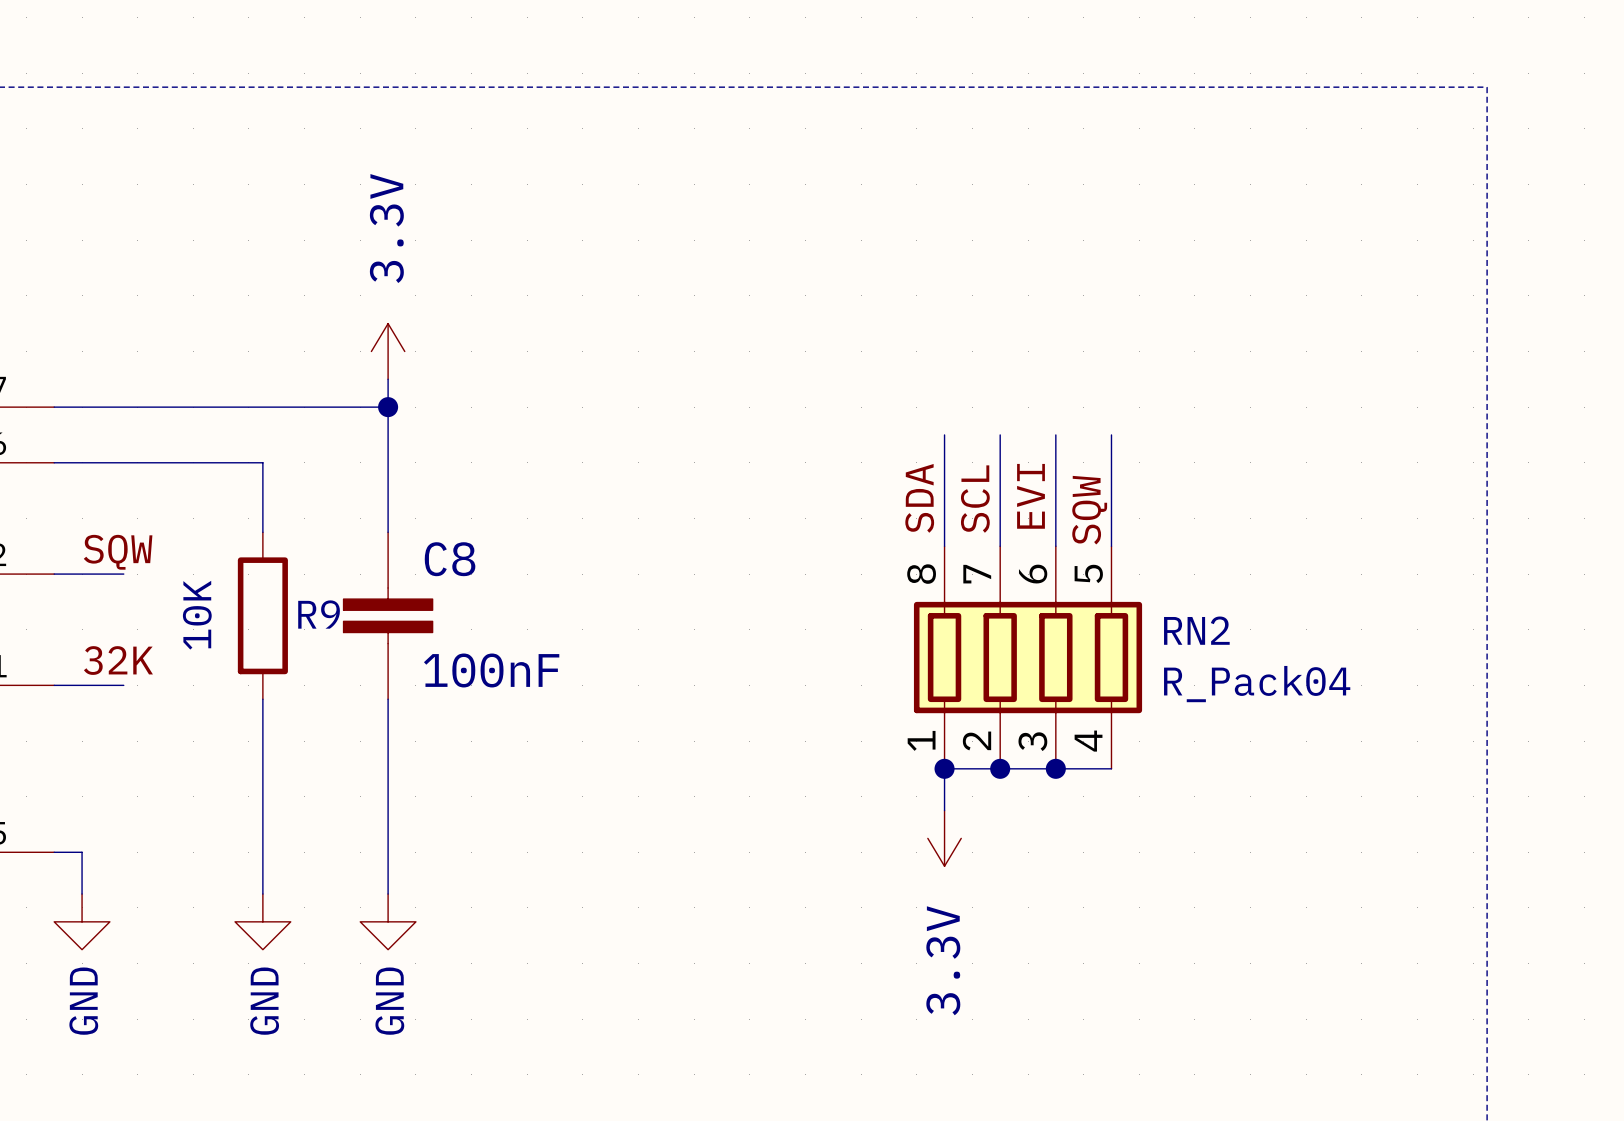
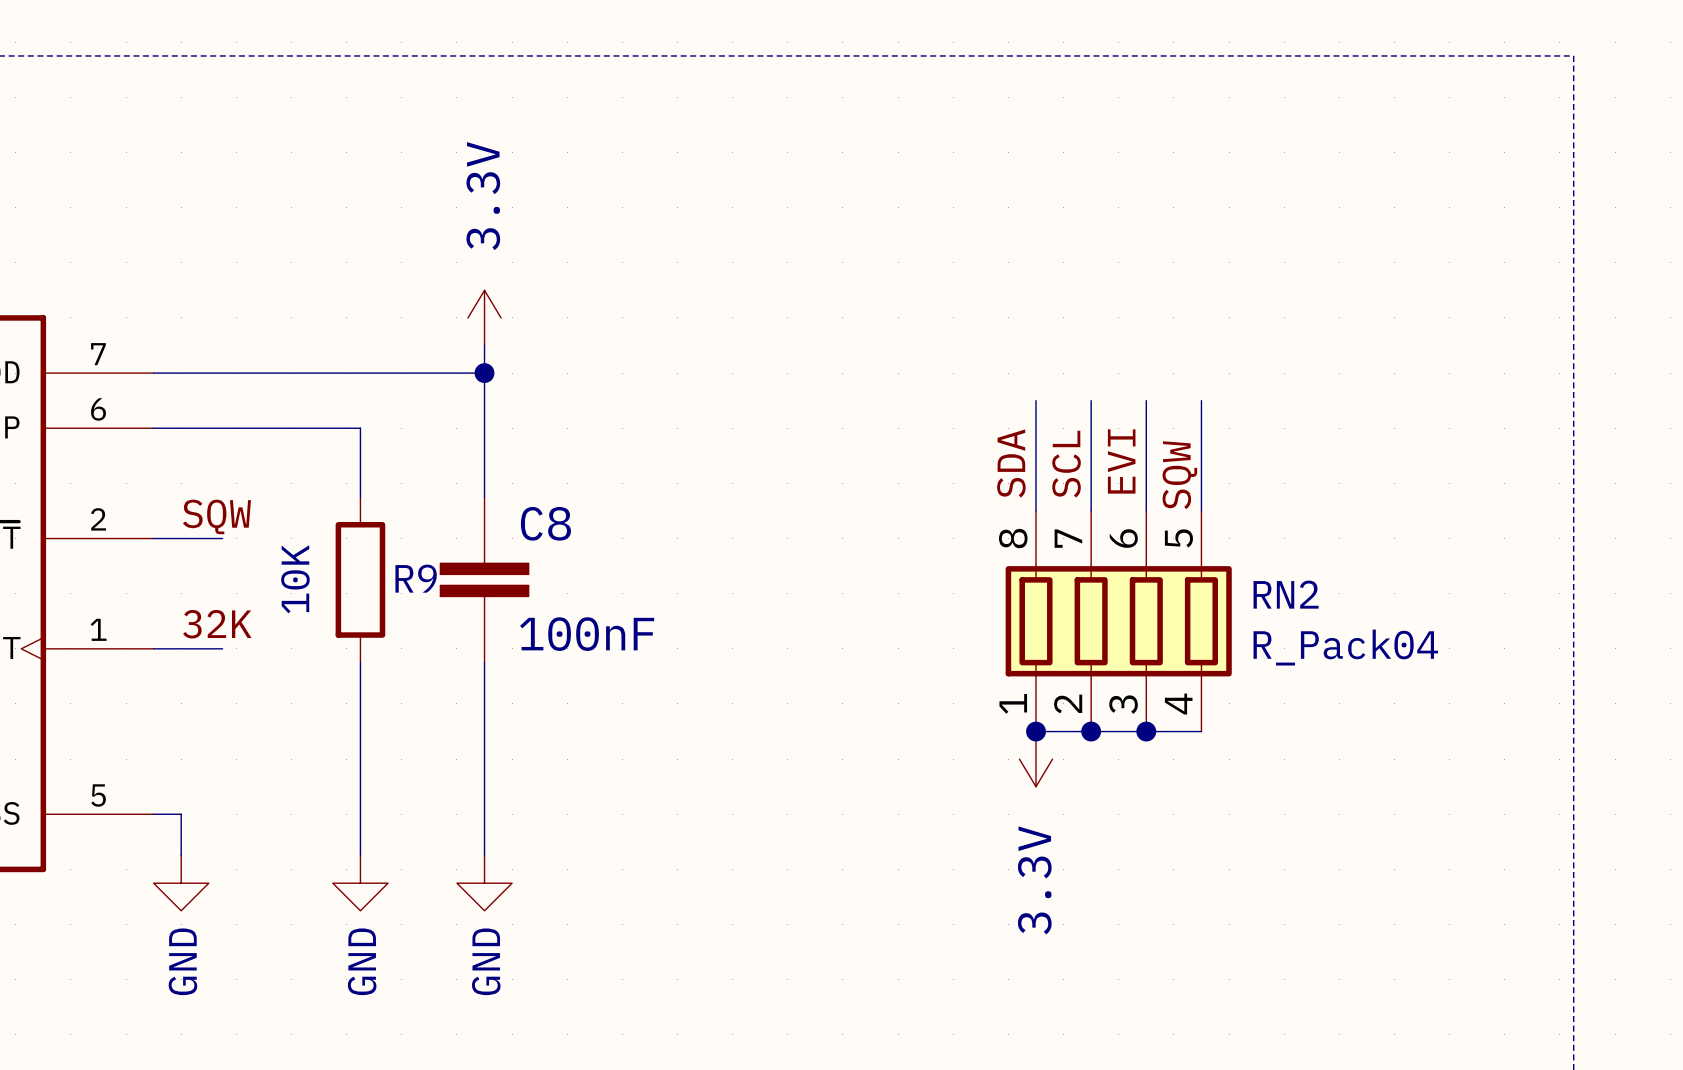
power symbol position: 3.3V (944, 838) -> 3.3V (1036, 759)

